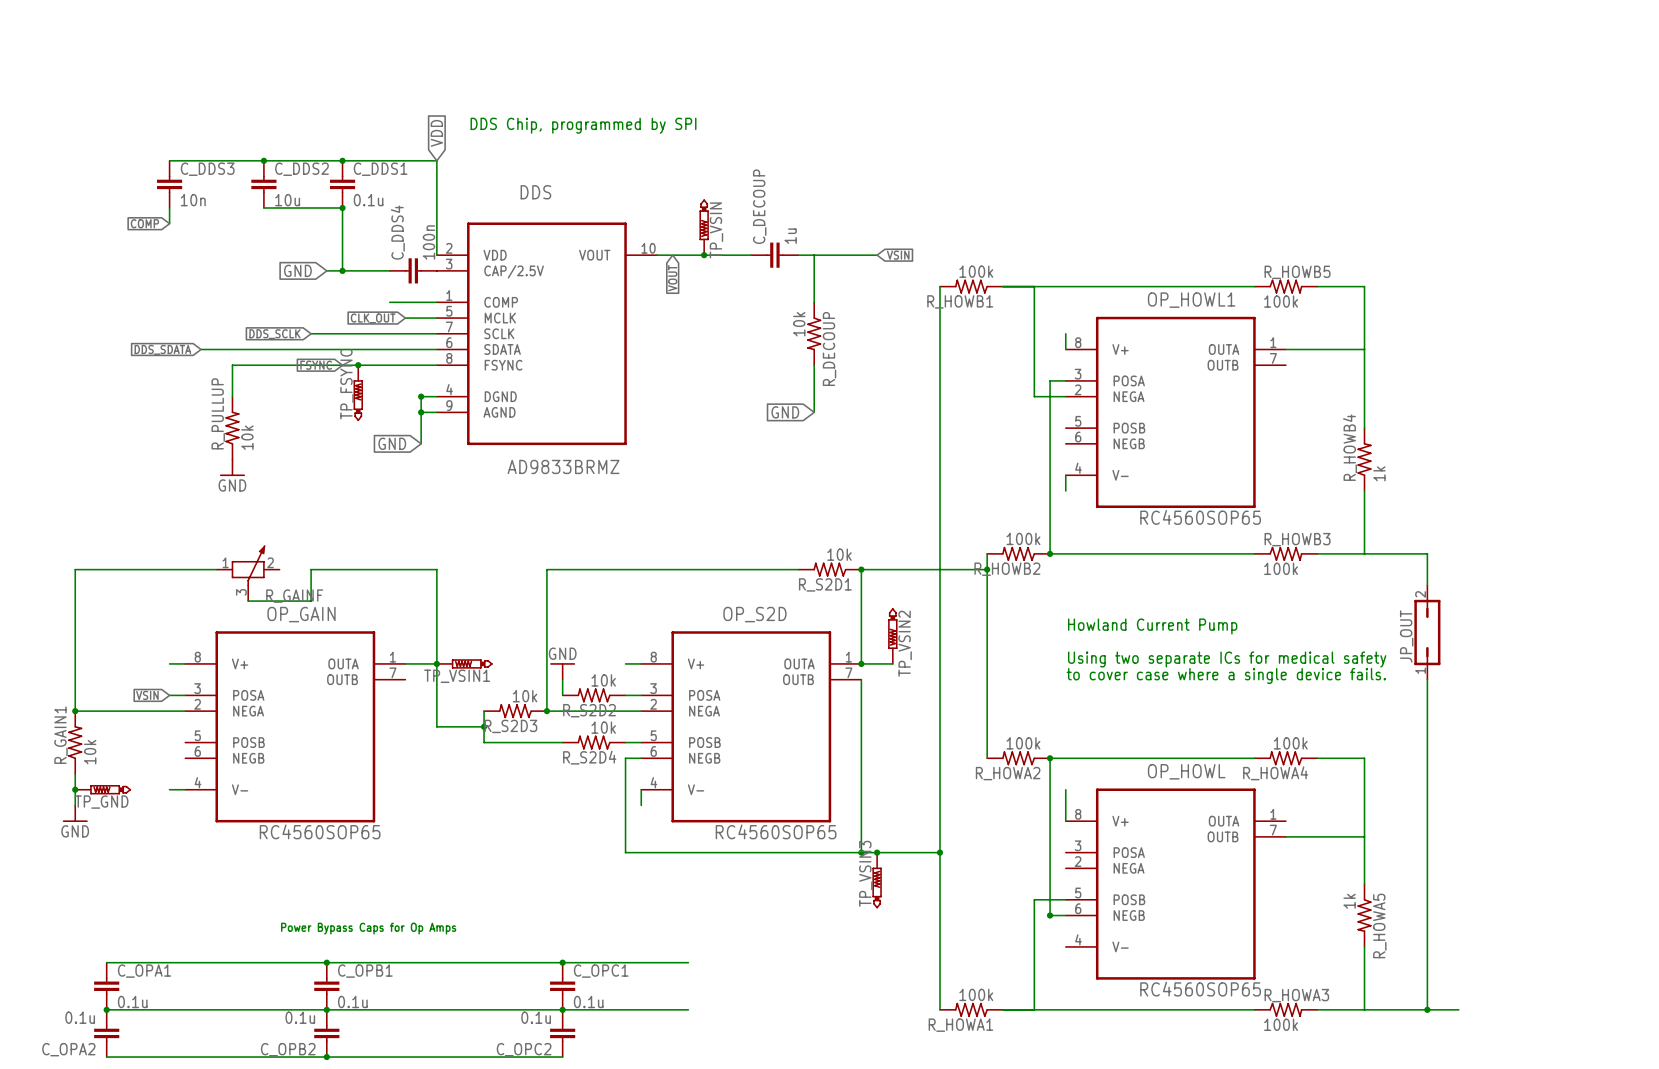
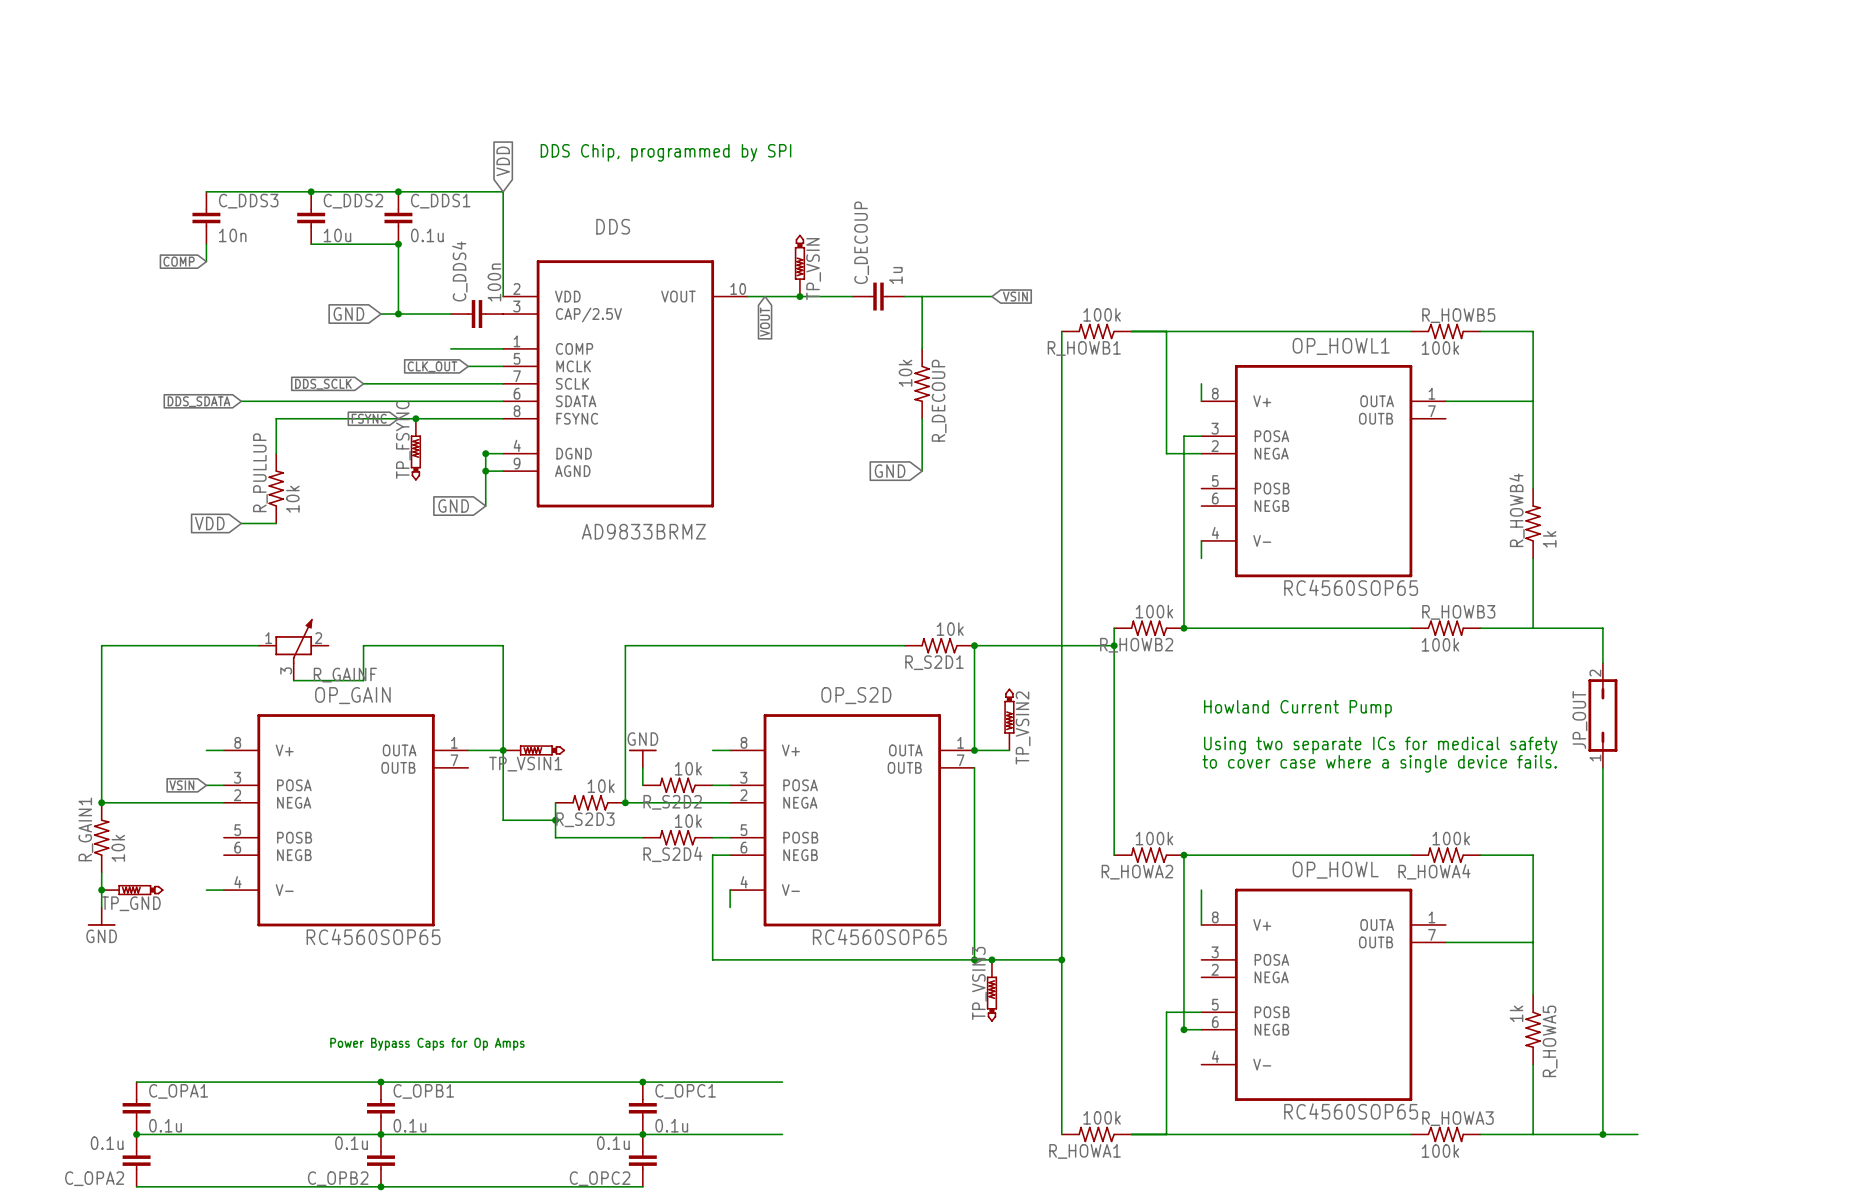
global label: none -> VDD (209, 523)
wire: none -> (241, 523) (276, 523)
power symbol: GND (232, 467) -> none

